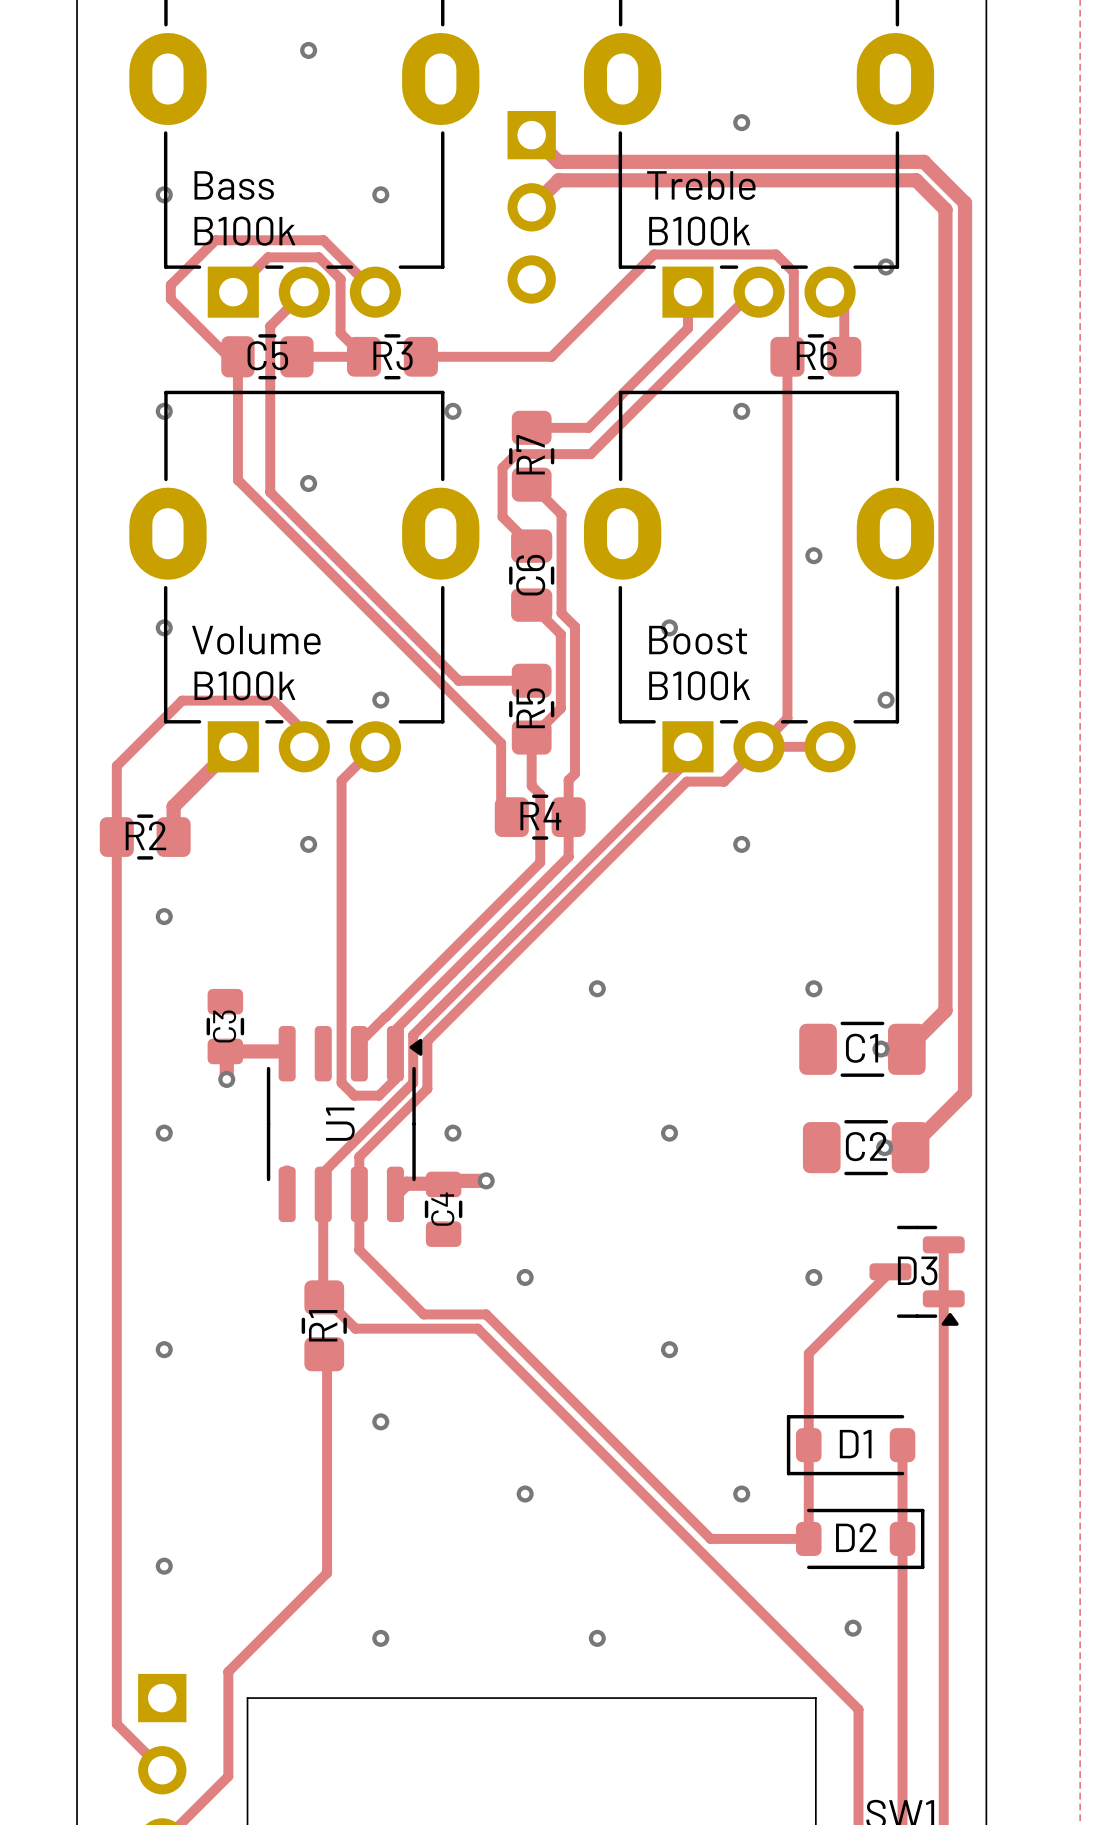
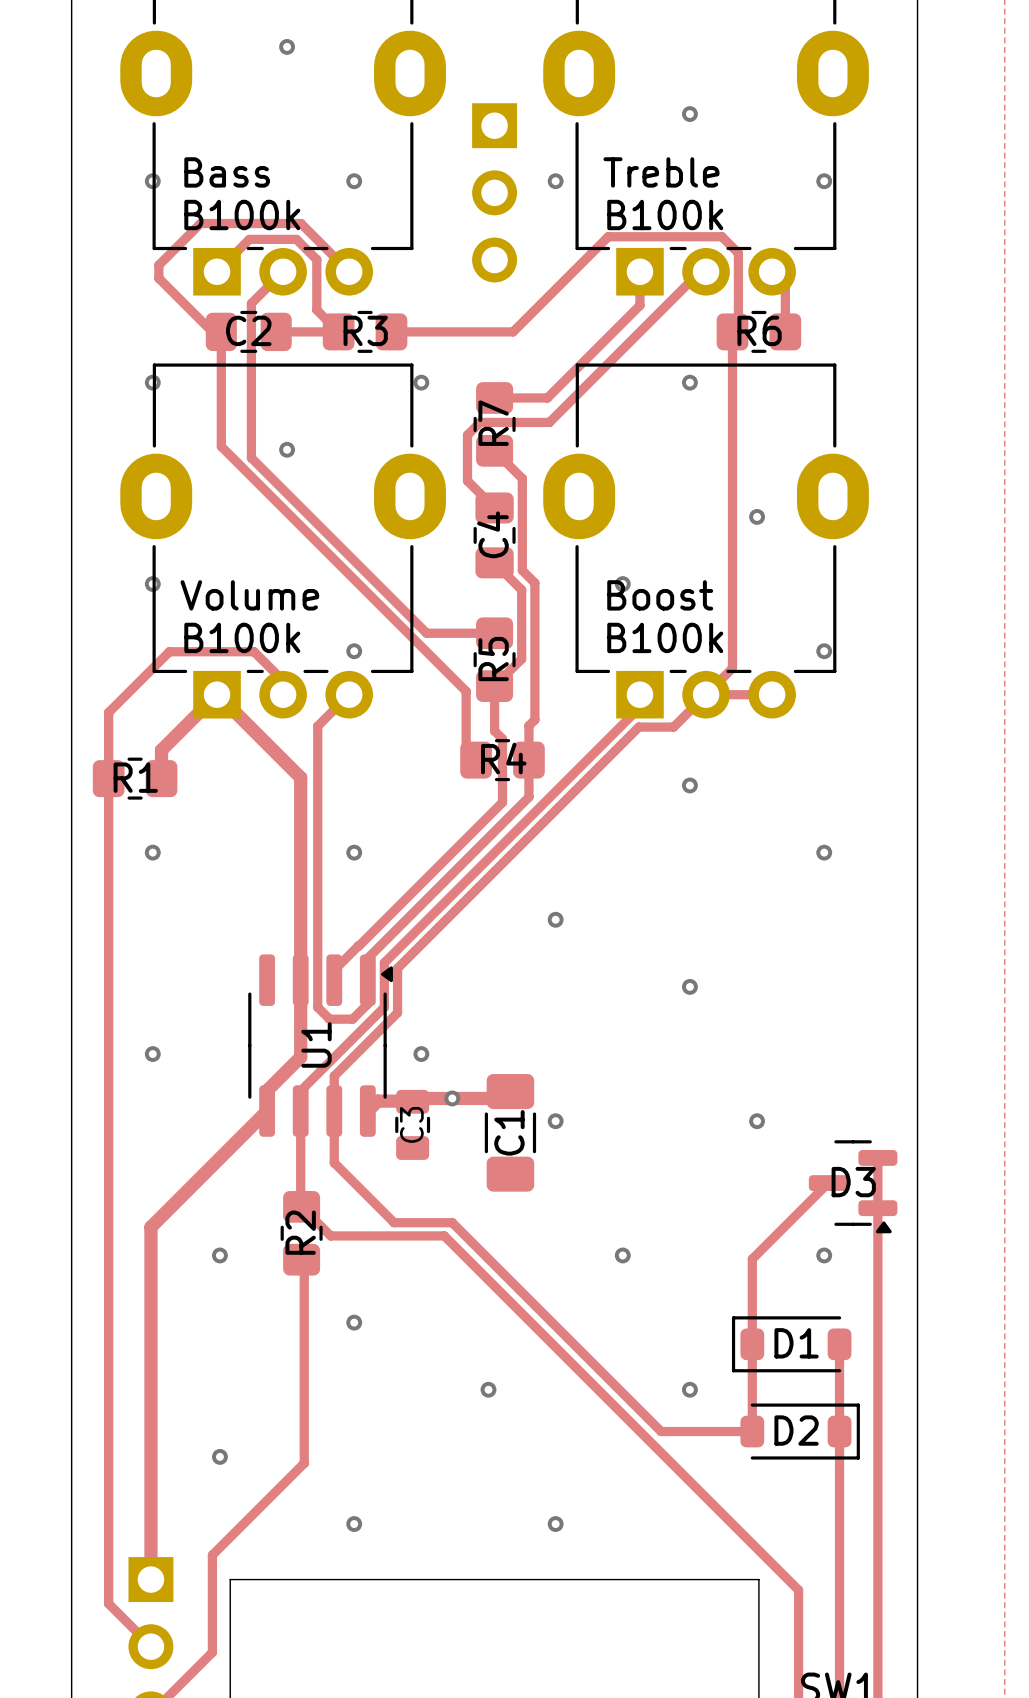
track: (531, 135) (558, 161) (923, 161) (965, 203) (965, 1093) (910, 1147) (884, 1147) -> none
via: none -> (555, 181)
track: (531, 207) (558, 180) (916, 180) (945, 209) (945, 1010) (906, 1049) (881, 1049) -> none
via position: (886, 266) -> (824, 181)
C5 name: C5 (267, 355) -> C2 (248, 330)
C6 name: C6 (530, 575) -> C4 (492, 534)
track: none -> (217, 694) (300, 777) (300, 1057) (267, 1090)
R2 name: R2 (145, 835) -> R1 (135, 777)
via position: (308, 844) -> (354, 852)
via: none -> (824, 852)
via: (813, 988) -> none
C3: (225, 1026) -> none
C1 rotation: 0° (862, 1049) -> 90° clockwise (510, 1132)
C1 position: (862, 1049) -> (510, 1132)
via: (880, 1049) -> none
track: (287, 1053) (284, 1051) (225, 1051) (226, 1079) -> none
via: none -> (689, 986)
via: (226, 1079) -> none
via: (669, 1133) -> none
C2: (866, 1147) -> none
via: (884, 1147) -> none
track: none -> (452, 1098) (503, 1098)
track: none -> (267, 1111) (150, 1227) (150, 1578)
via: none -> (555, 1121)
via: none -> (757, 1121)
C4 name: C4 (442, 1209) -> C3 (411, 1124)
via: (525, 1277) -> none
via: (813, 1277) -> none
R1 name: R1 (323, 1325) -> R2 (300, 1232)
via position: (164, 1349) -> (219, 1255)
via: none -> (824, 1255)
via position: (164, 1566) -> (219, 1456)
via: (853, 1628) -> none

